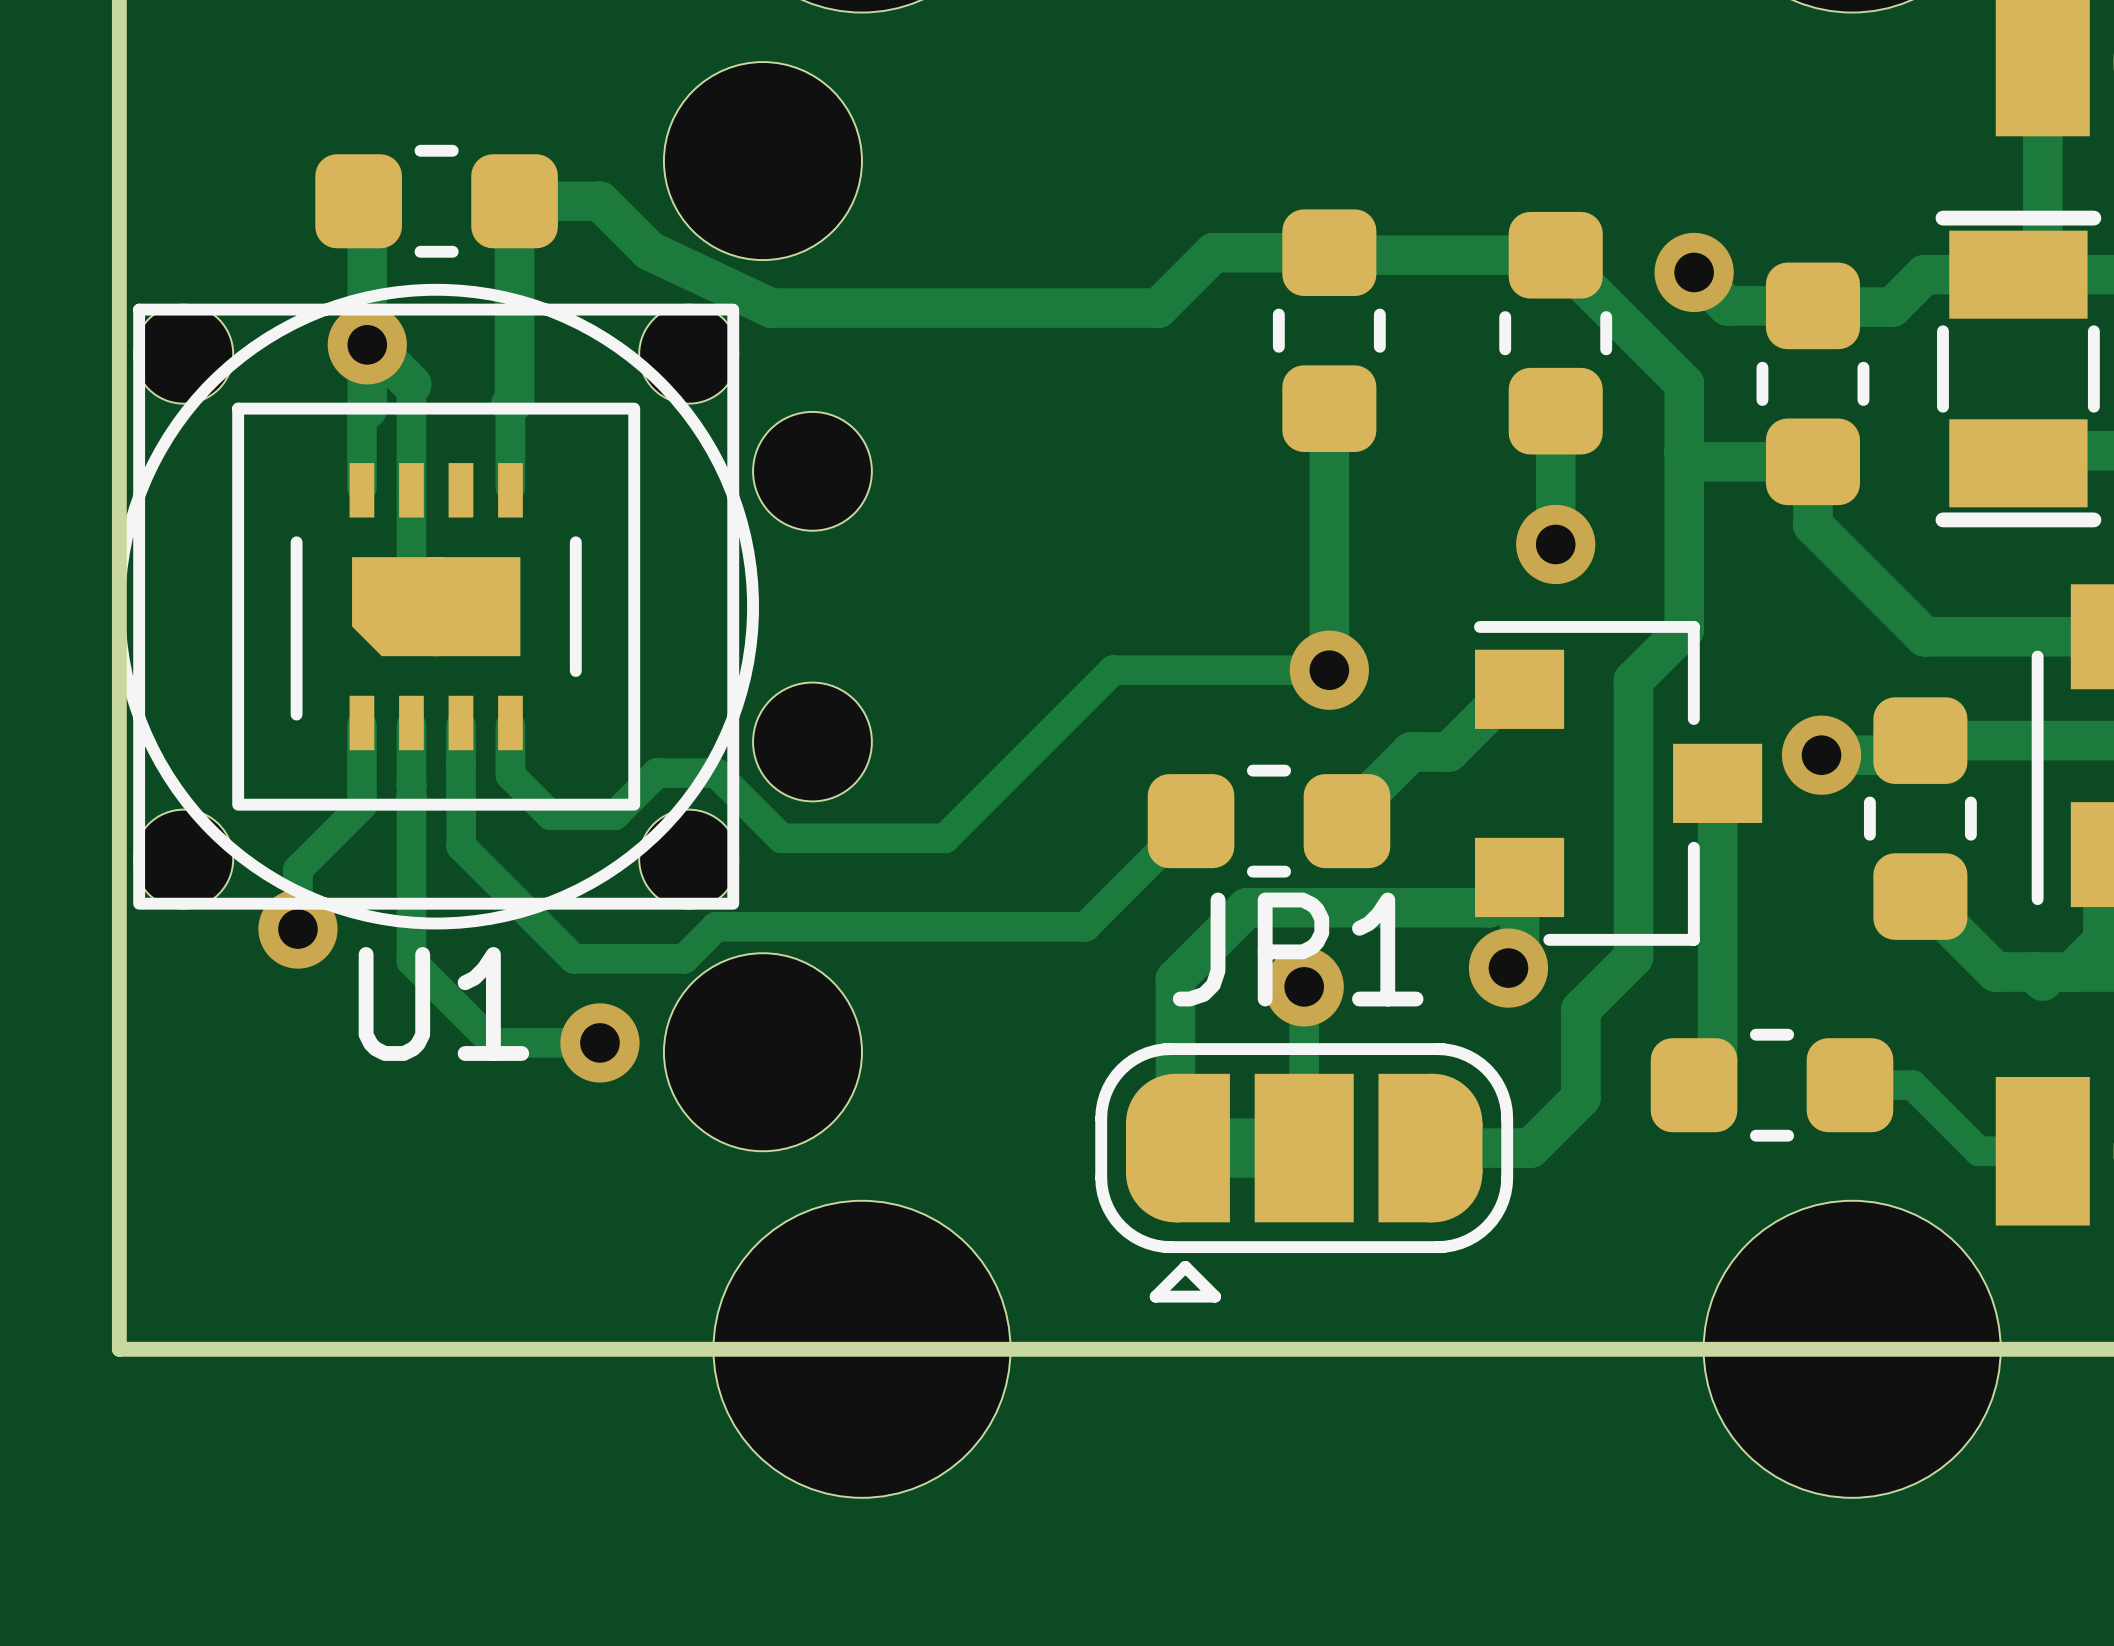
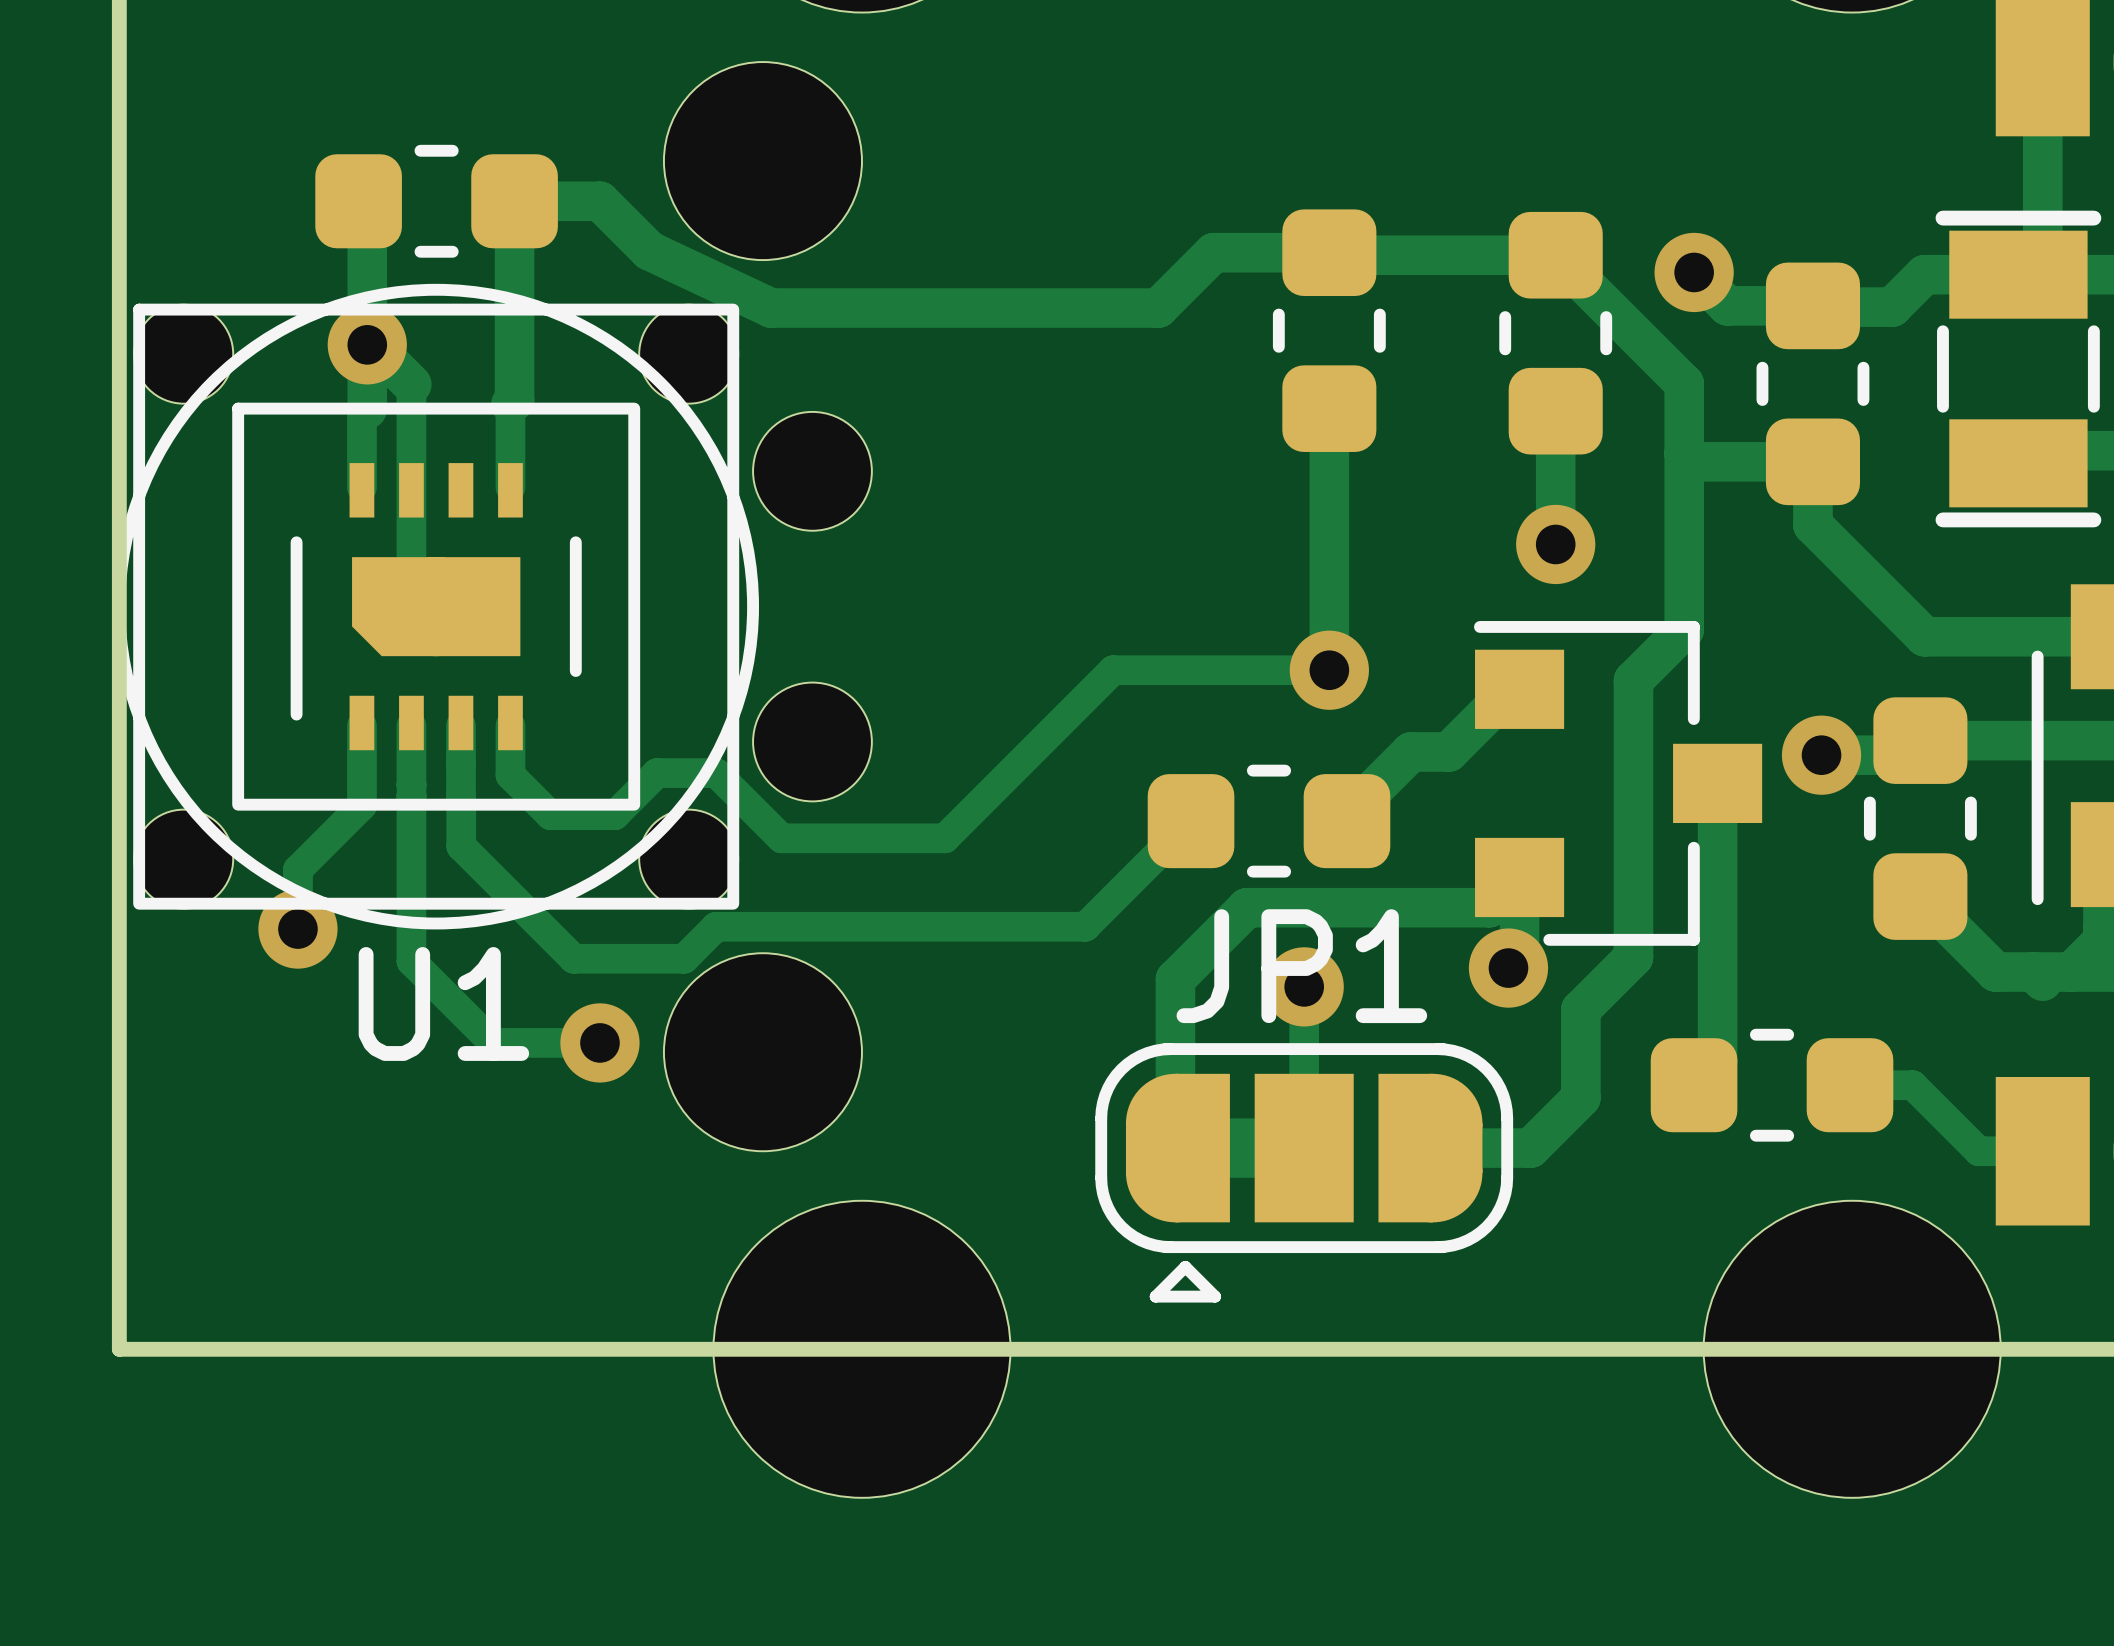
JP1 name position: JP1 (1298, 949) -> JP1 (1301, 966)

